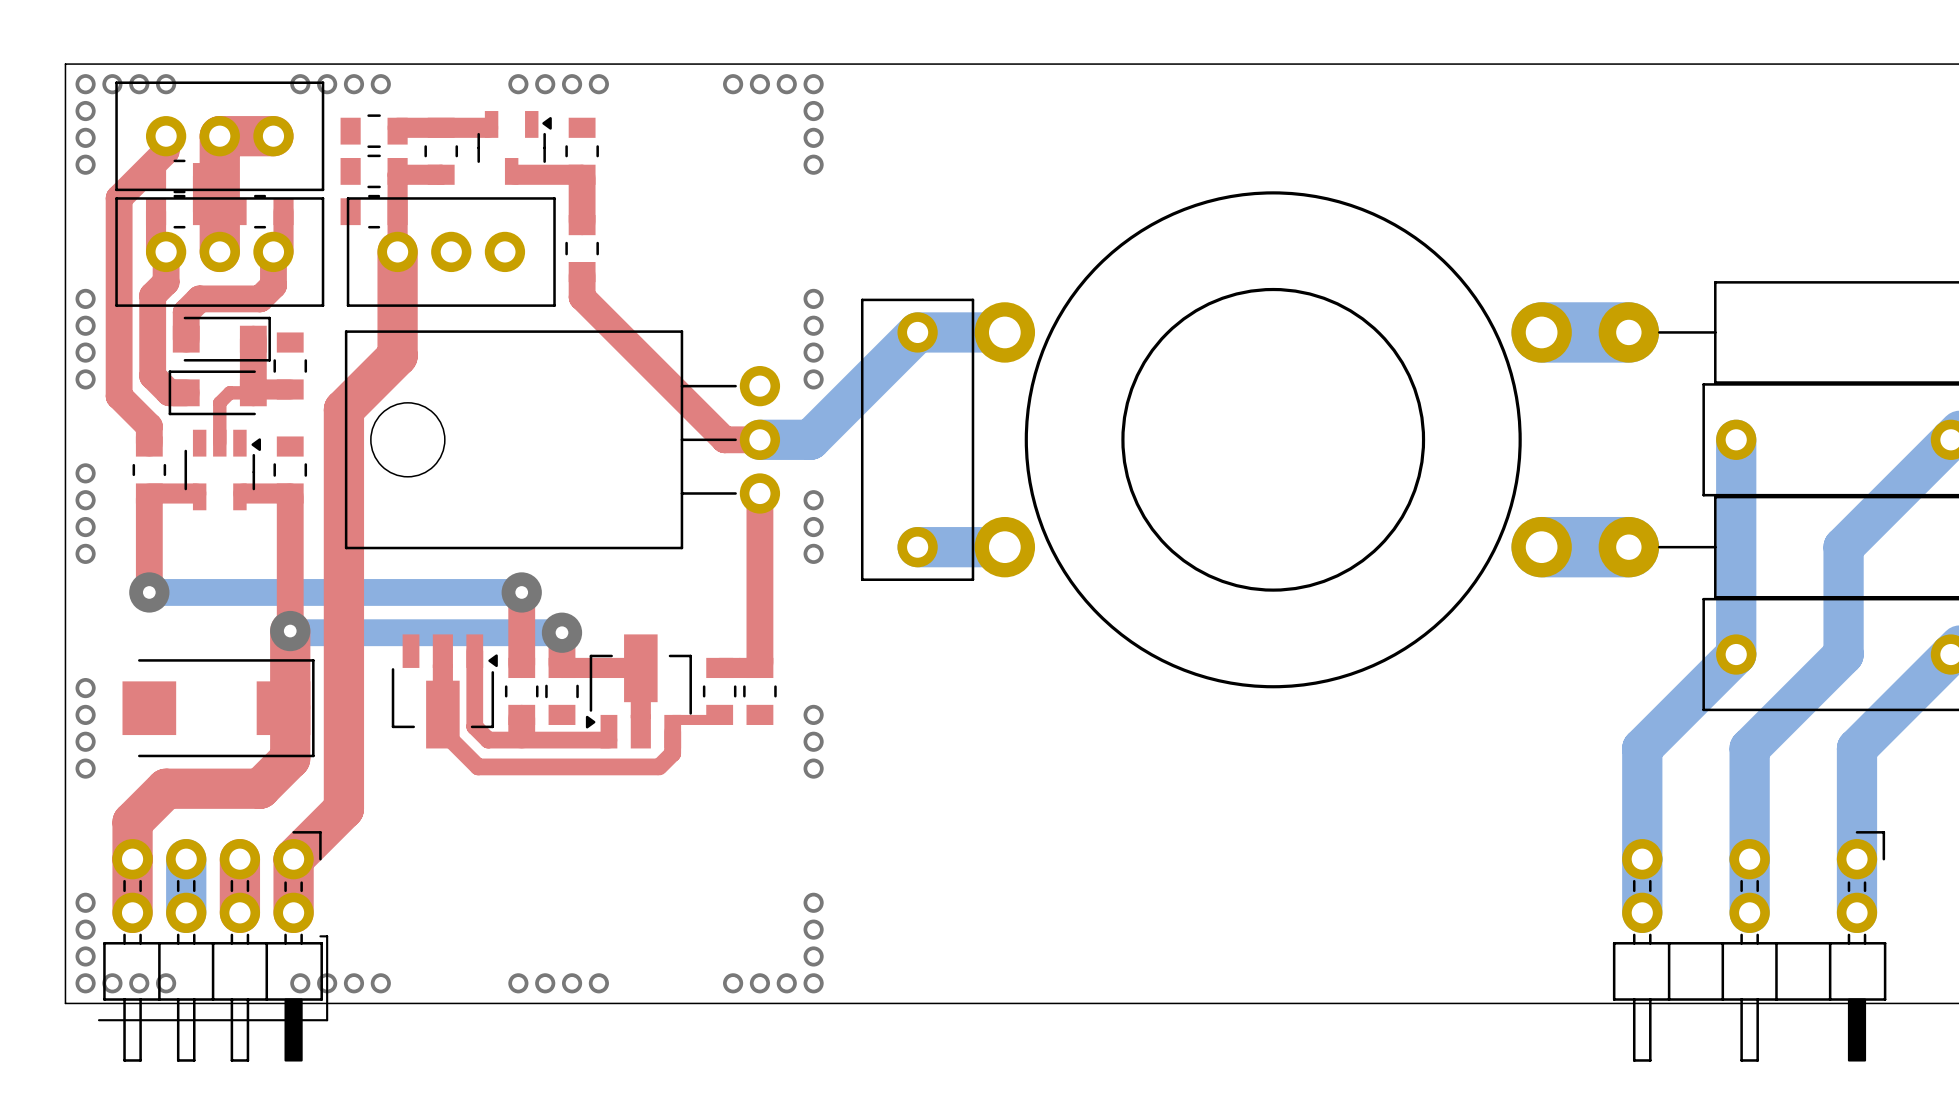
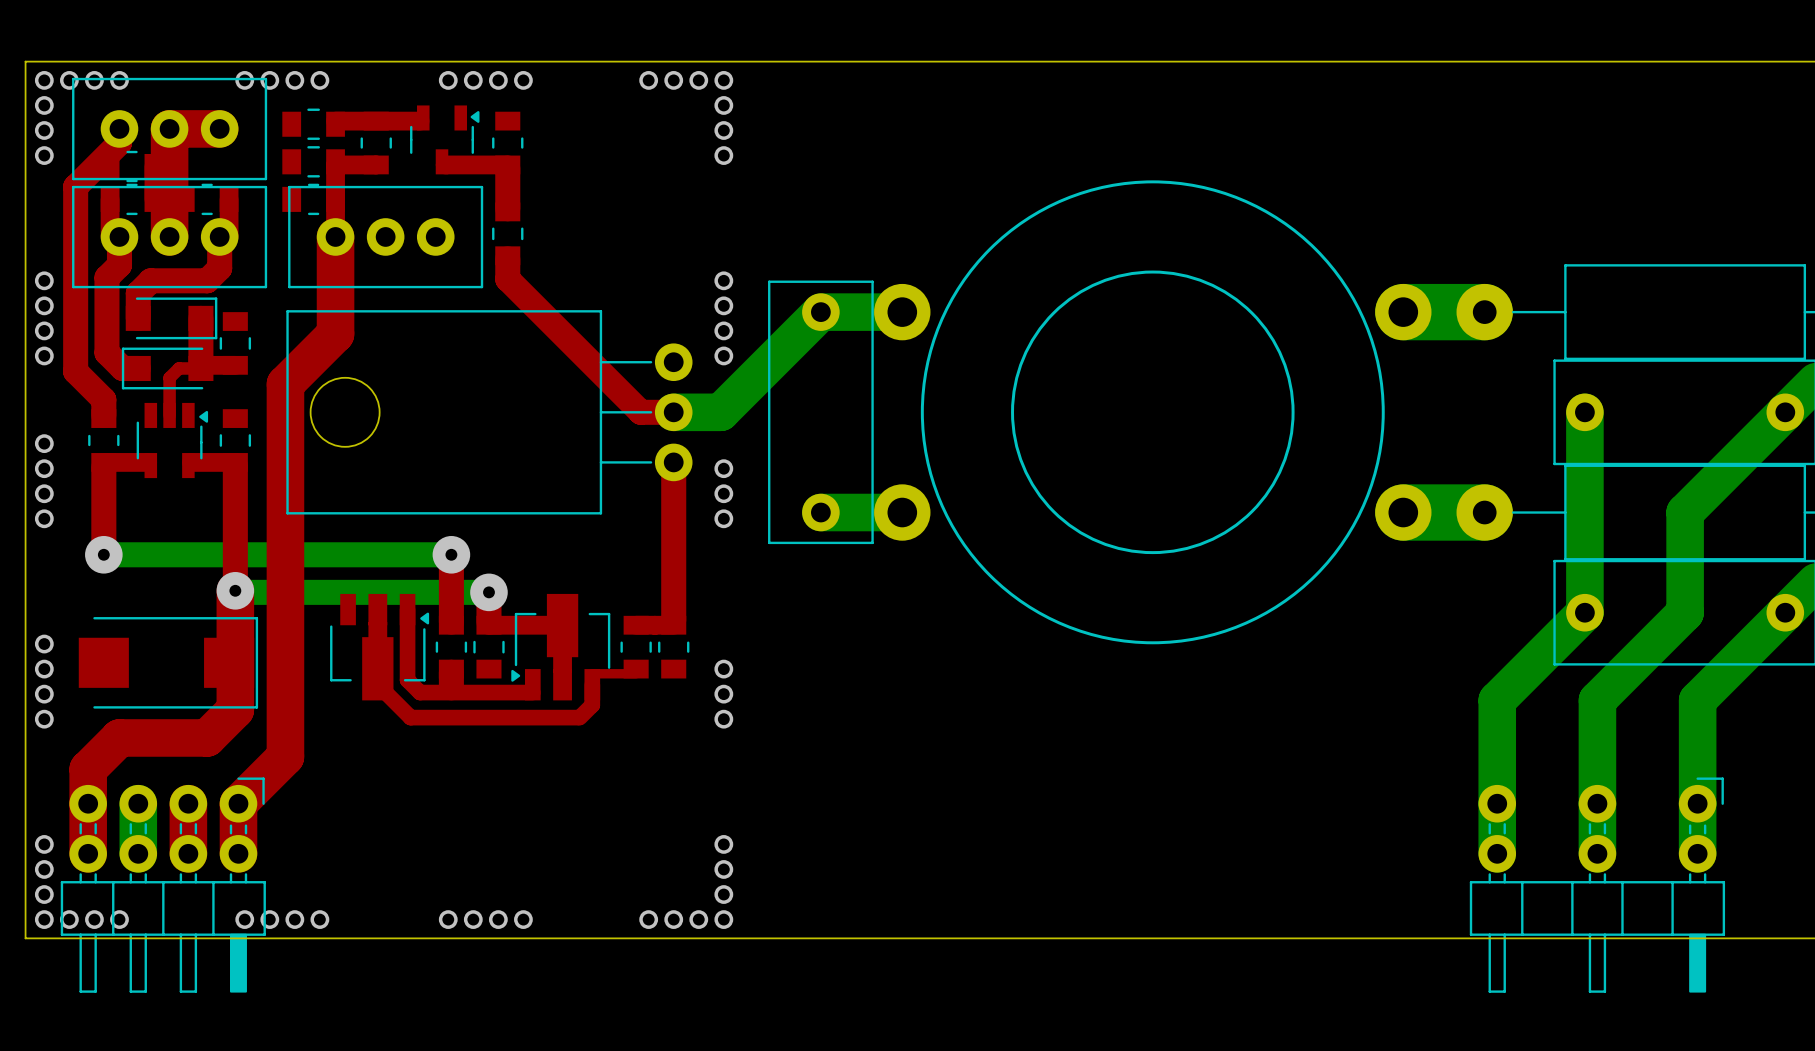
line: (320, 936) (327, 936) (327, 1020) (99, 1020) -> none

